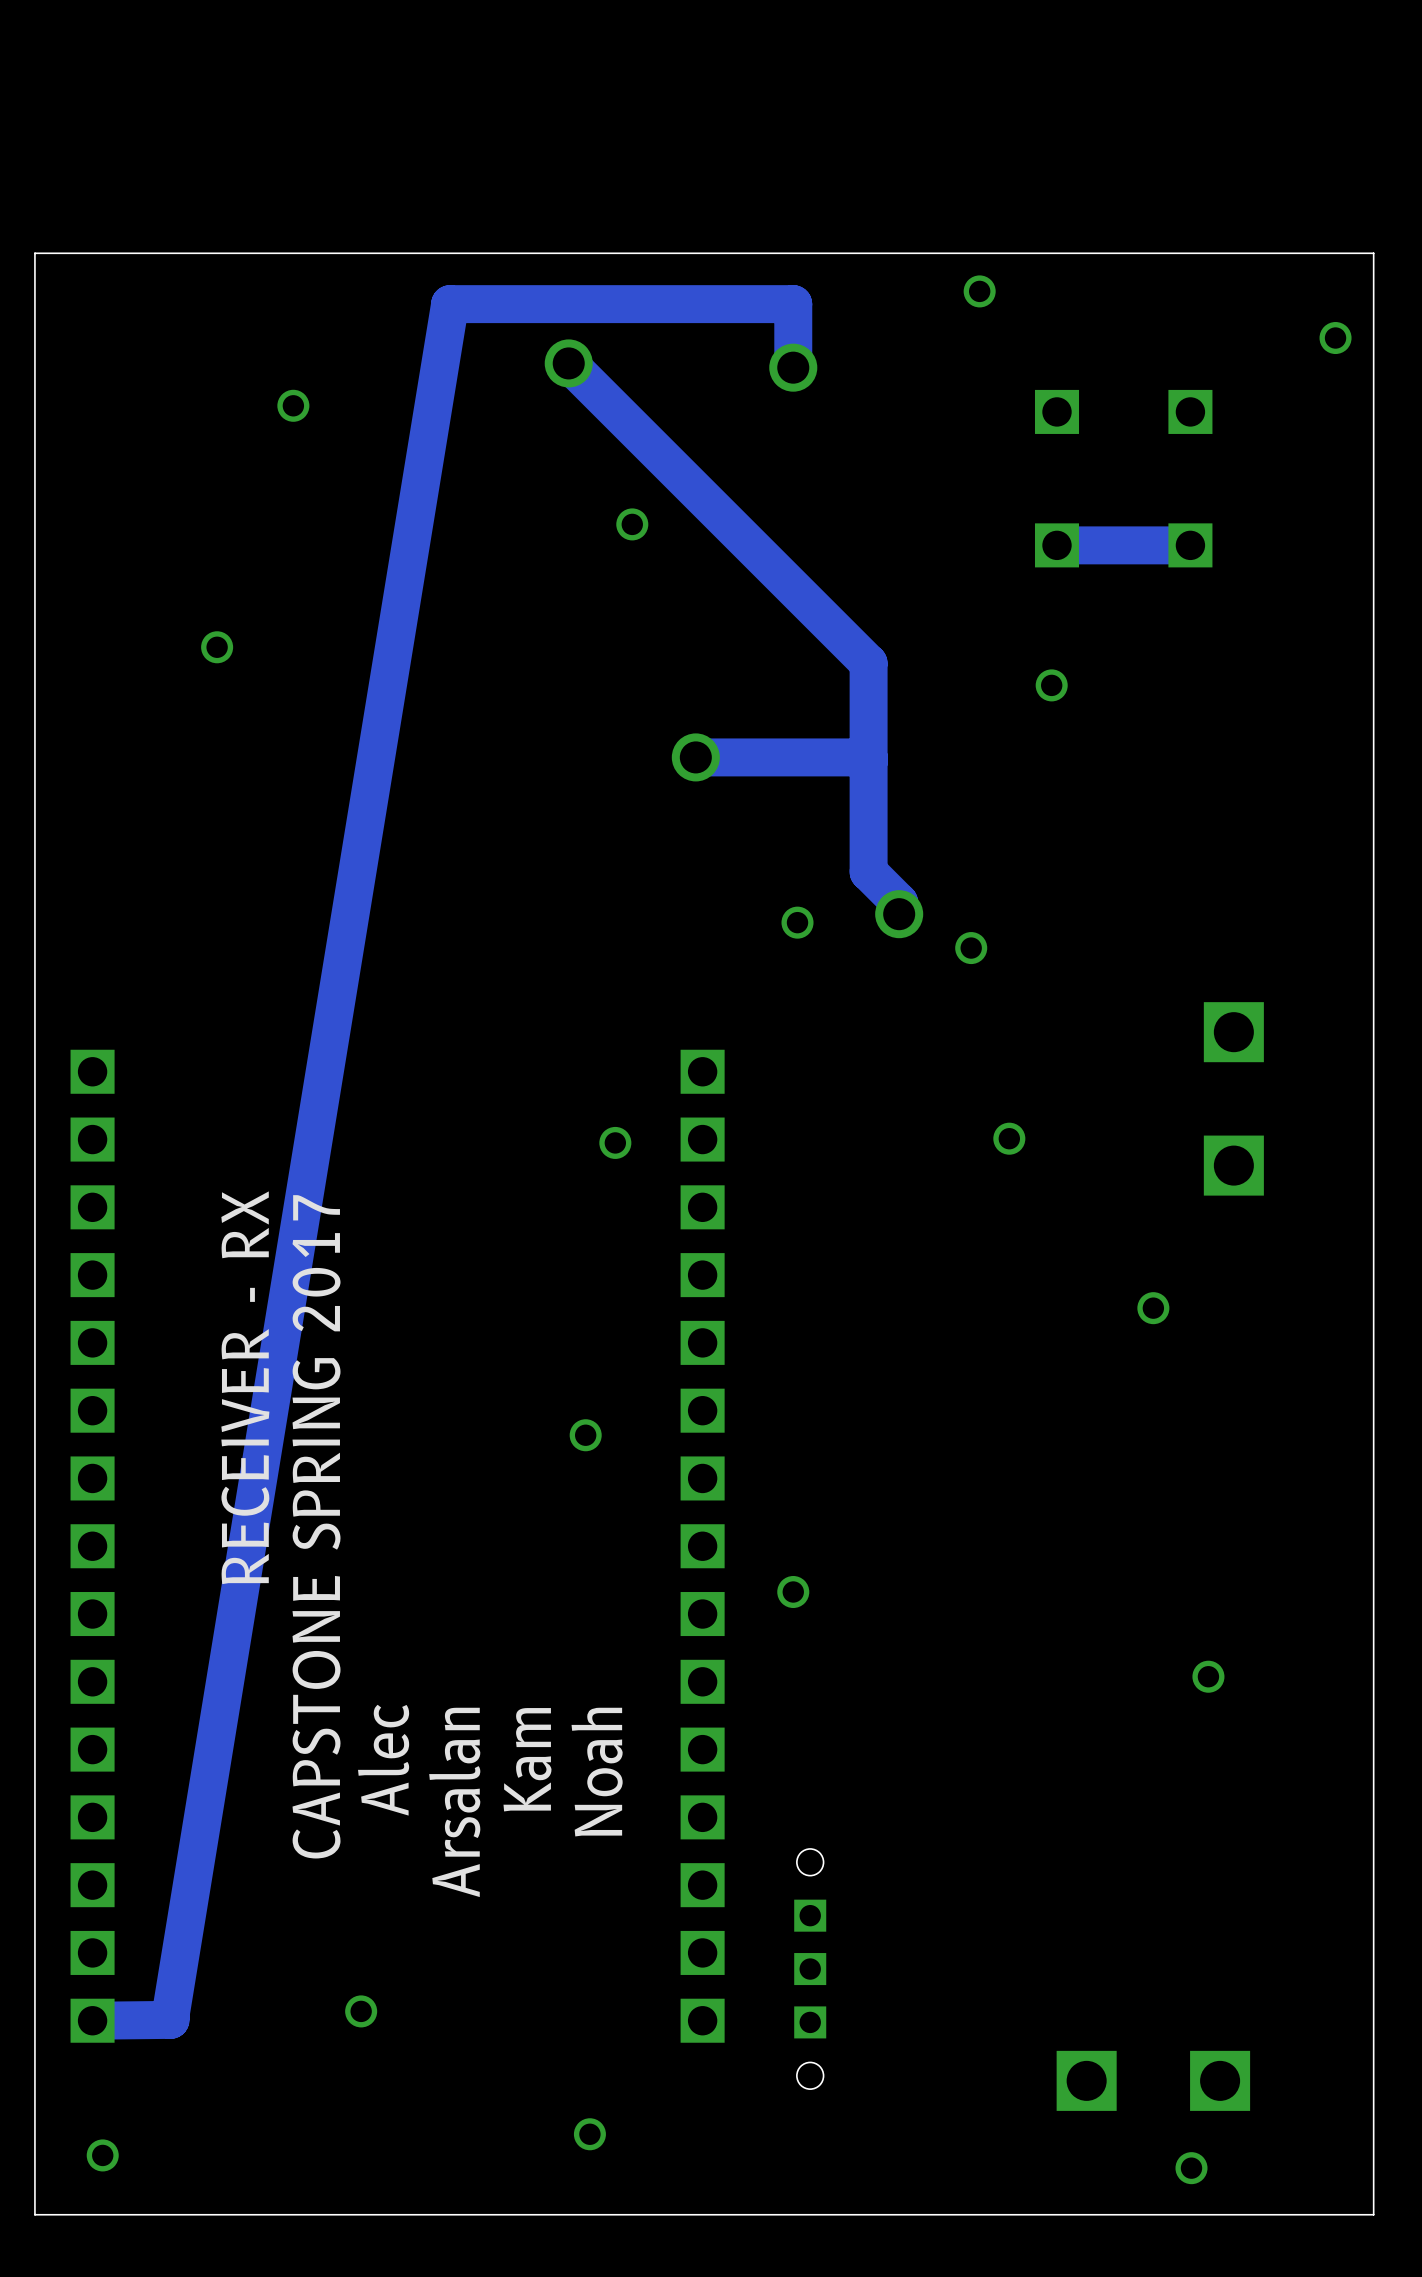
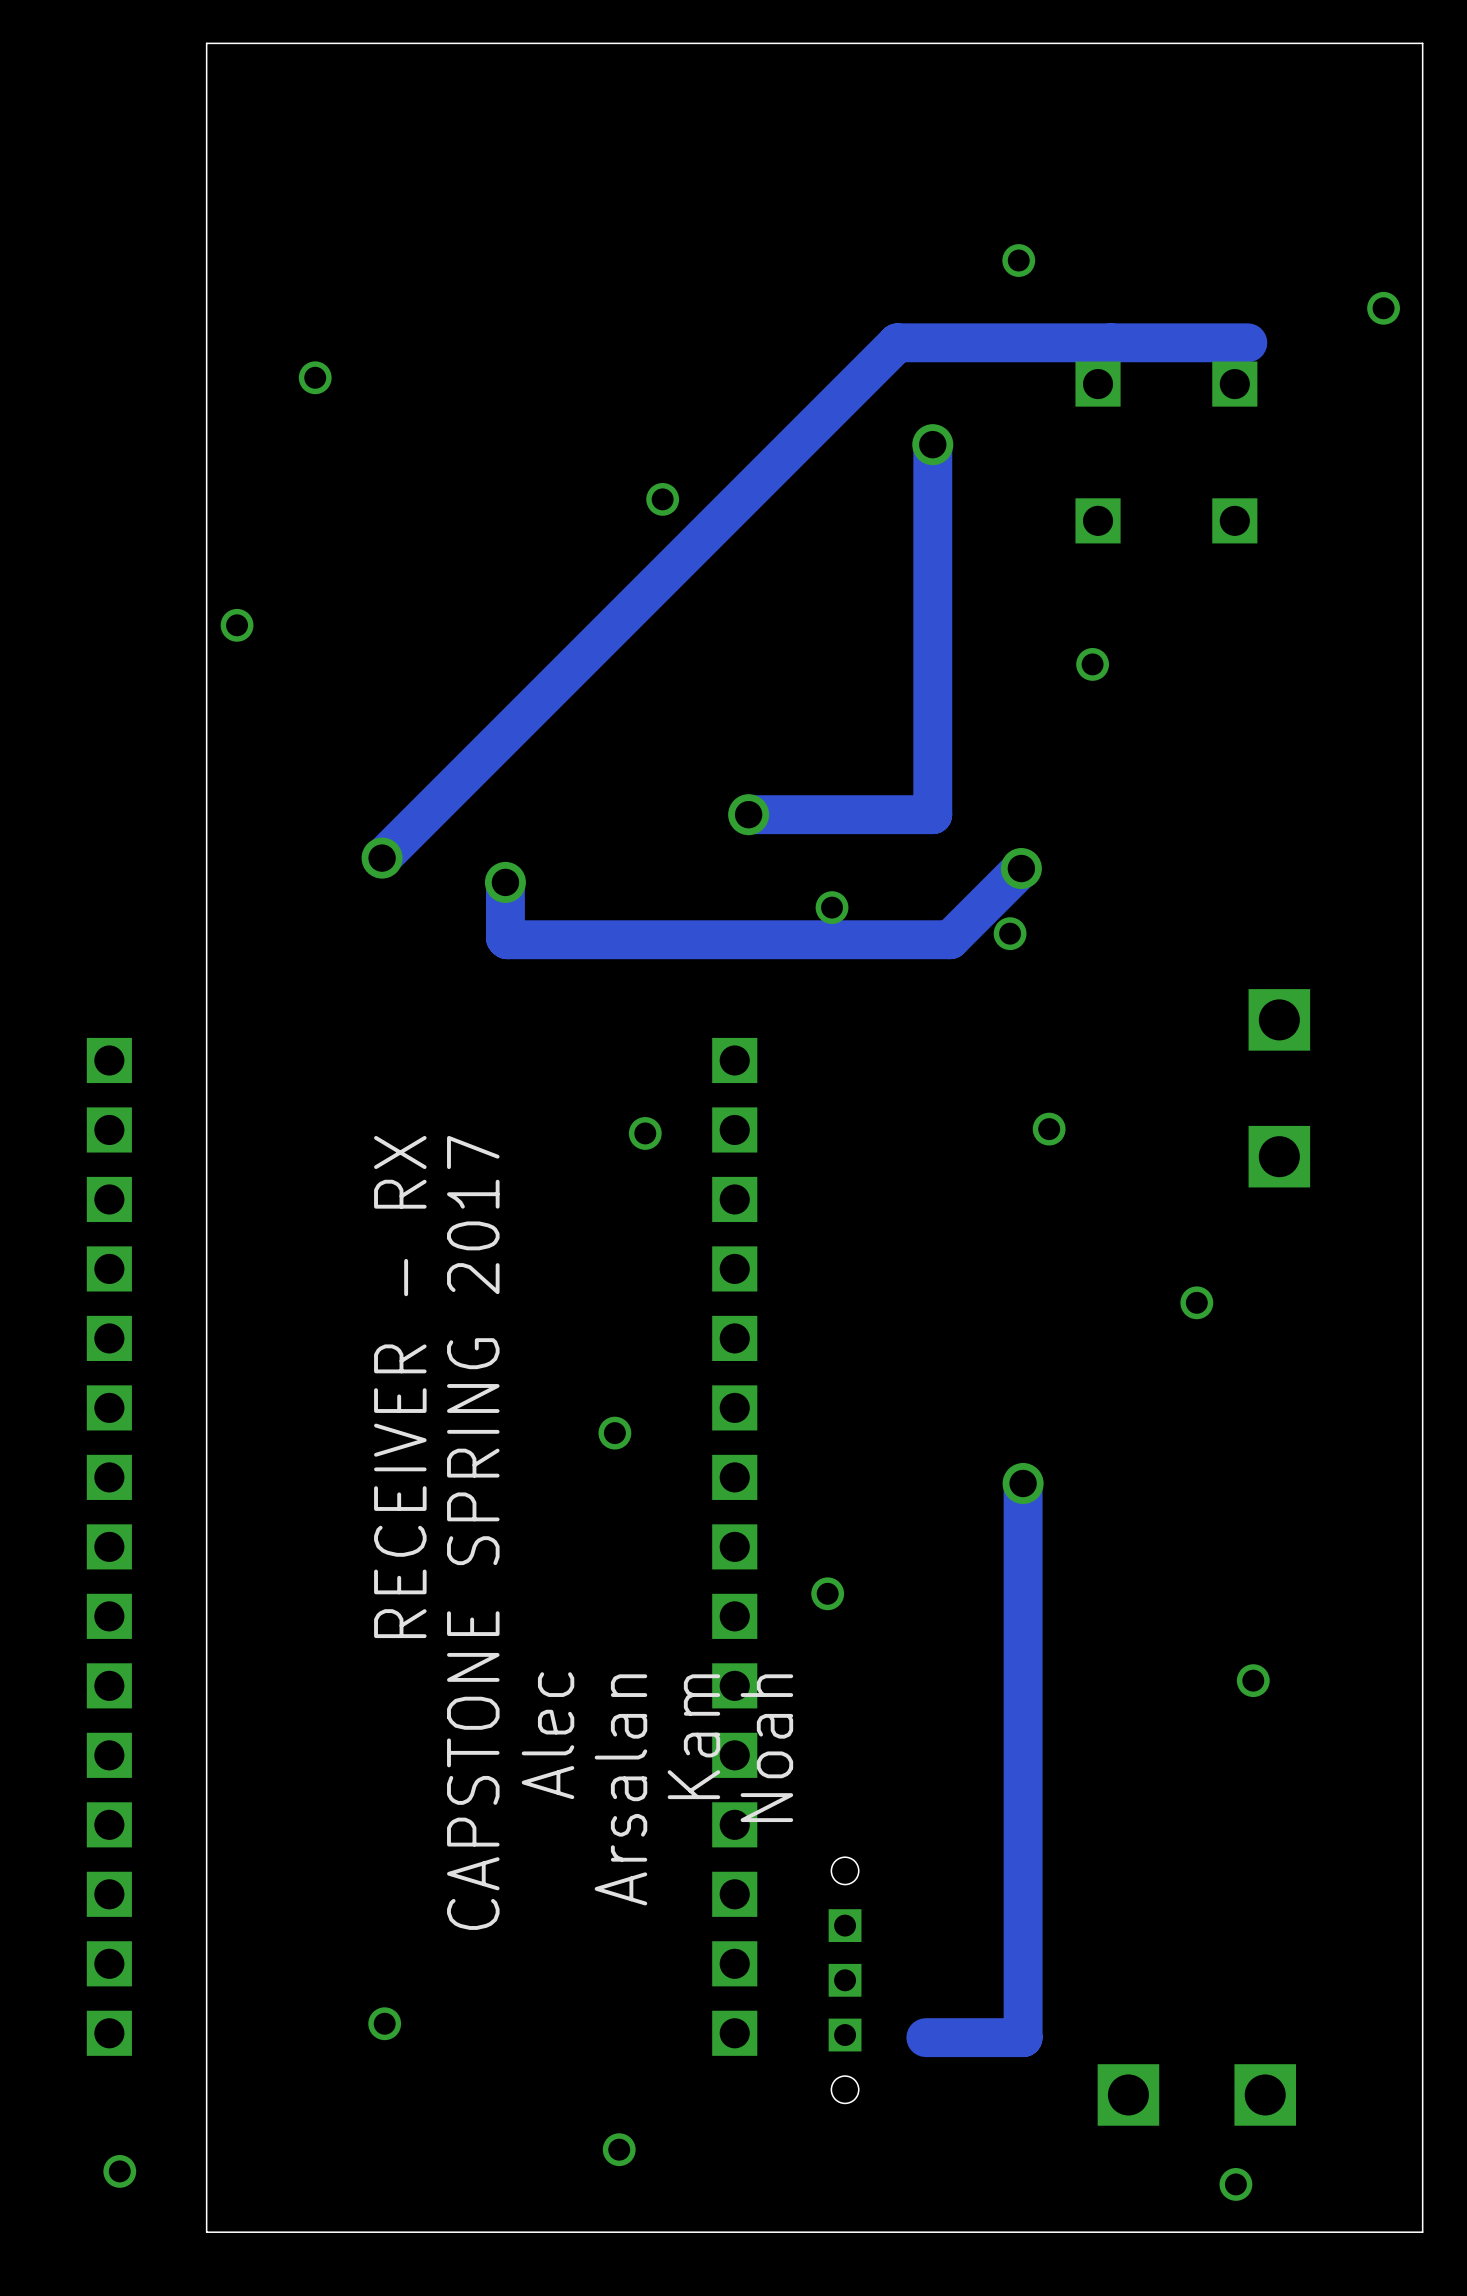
board edge: (1373, 253) (34, 253) (34, 2214) (187, 2214) -> (1422, 221) (1422, 43) (206, 43) (206, 2232)
track: (568, 363) (868, 663) (868, 871) (899, 902) (899, 914) -> none
via: (568, 363) -> none
track: (793, 367) (793, 304) (450, 304) (170, 2019) (92, 2020) -> none
via: (793, 367) -> none
track: none -> (1247, 342) (897, 342) (382, 858)
track: none -> (932, 444) (932, 814) (748, 814)
via: none -> (932, 444)
track: (1190, 545) (1057, 545) -> none
via: (695, 757) -> none
track: (868, 757) (695, 757) -> none
via: none -> (748, 814)
via: none -> (382, 858)
track: none -> (1021, 868) (950, 939) (507, 939) (505, 938) (505, 882)
via: none -> (1021, 868)
via: none -> (505, 882)
via: (899, 914) -> none
text position: RECEIVER - RX (245, 1387) -> RECEIVER - RX (400, 1387)
track: none -> (1023, 1483) (1023, 2037) (925, 2037)
via: none -> (1023, 1483)
text position: CAPSTONE SPRING 2017 (316, 1526) -> CAPSTONE SPRING 2017 (473, 1532)
text position: Kam (527, 1759) -> Kam (693, 1736)
text position: Alec (383, 1760) -> Alec (548, 1735)
text position: Noah (597, 1772) -> Noah (766, 1748)
text position: Arsalan (454, 1802) -> Arsalan (620, 1789)

